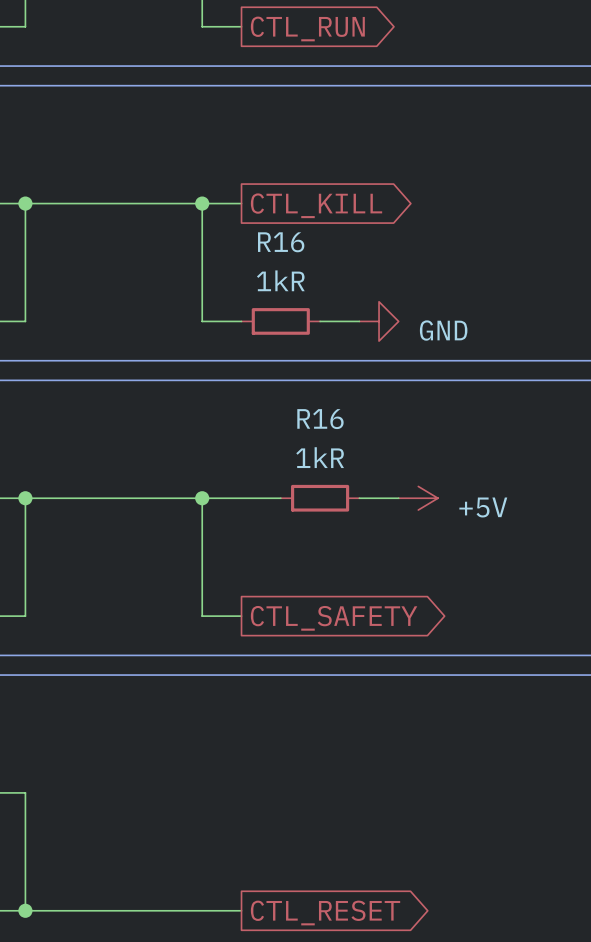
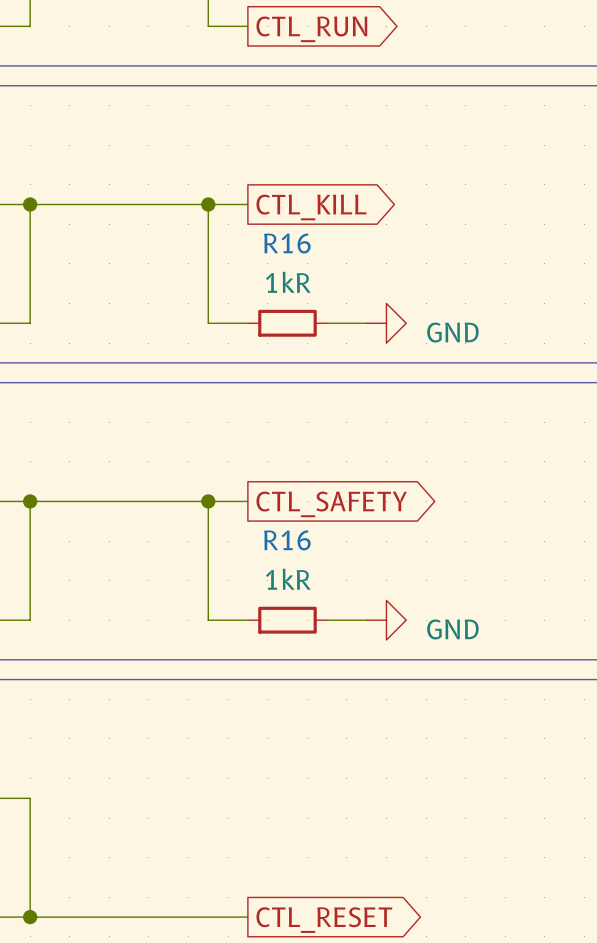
wire: (241, 498) (280, 498) -> none
R16 position: (320, 498) -> (287, 620)
wire: (359, 498) (398, 498) -> (327, 620) (366, 620)
power symbol: +5V (418, 498) -> none
power symbol: none -> GND (386, 620)
global label position: CTL_SAFETY (334, 618) -> CTL_SAFETY (331, 504)

